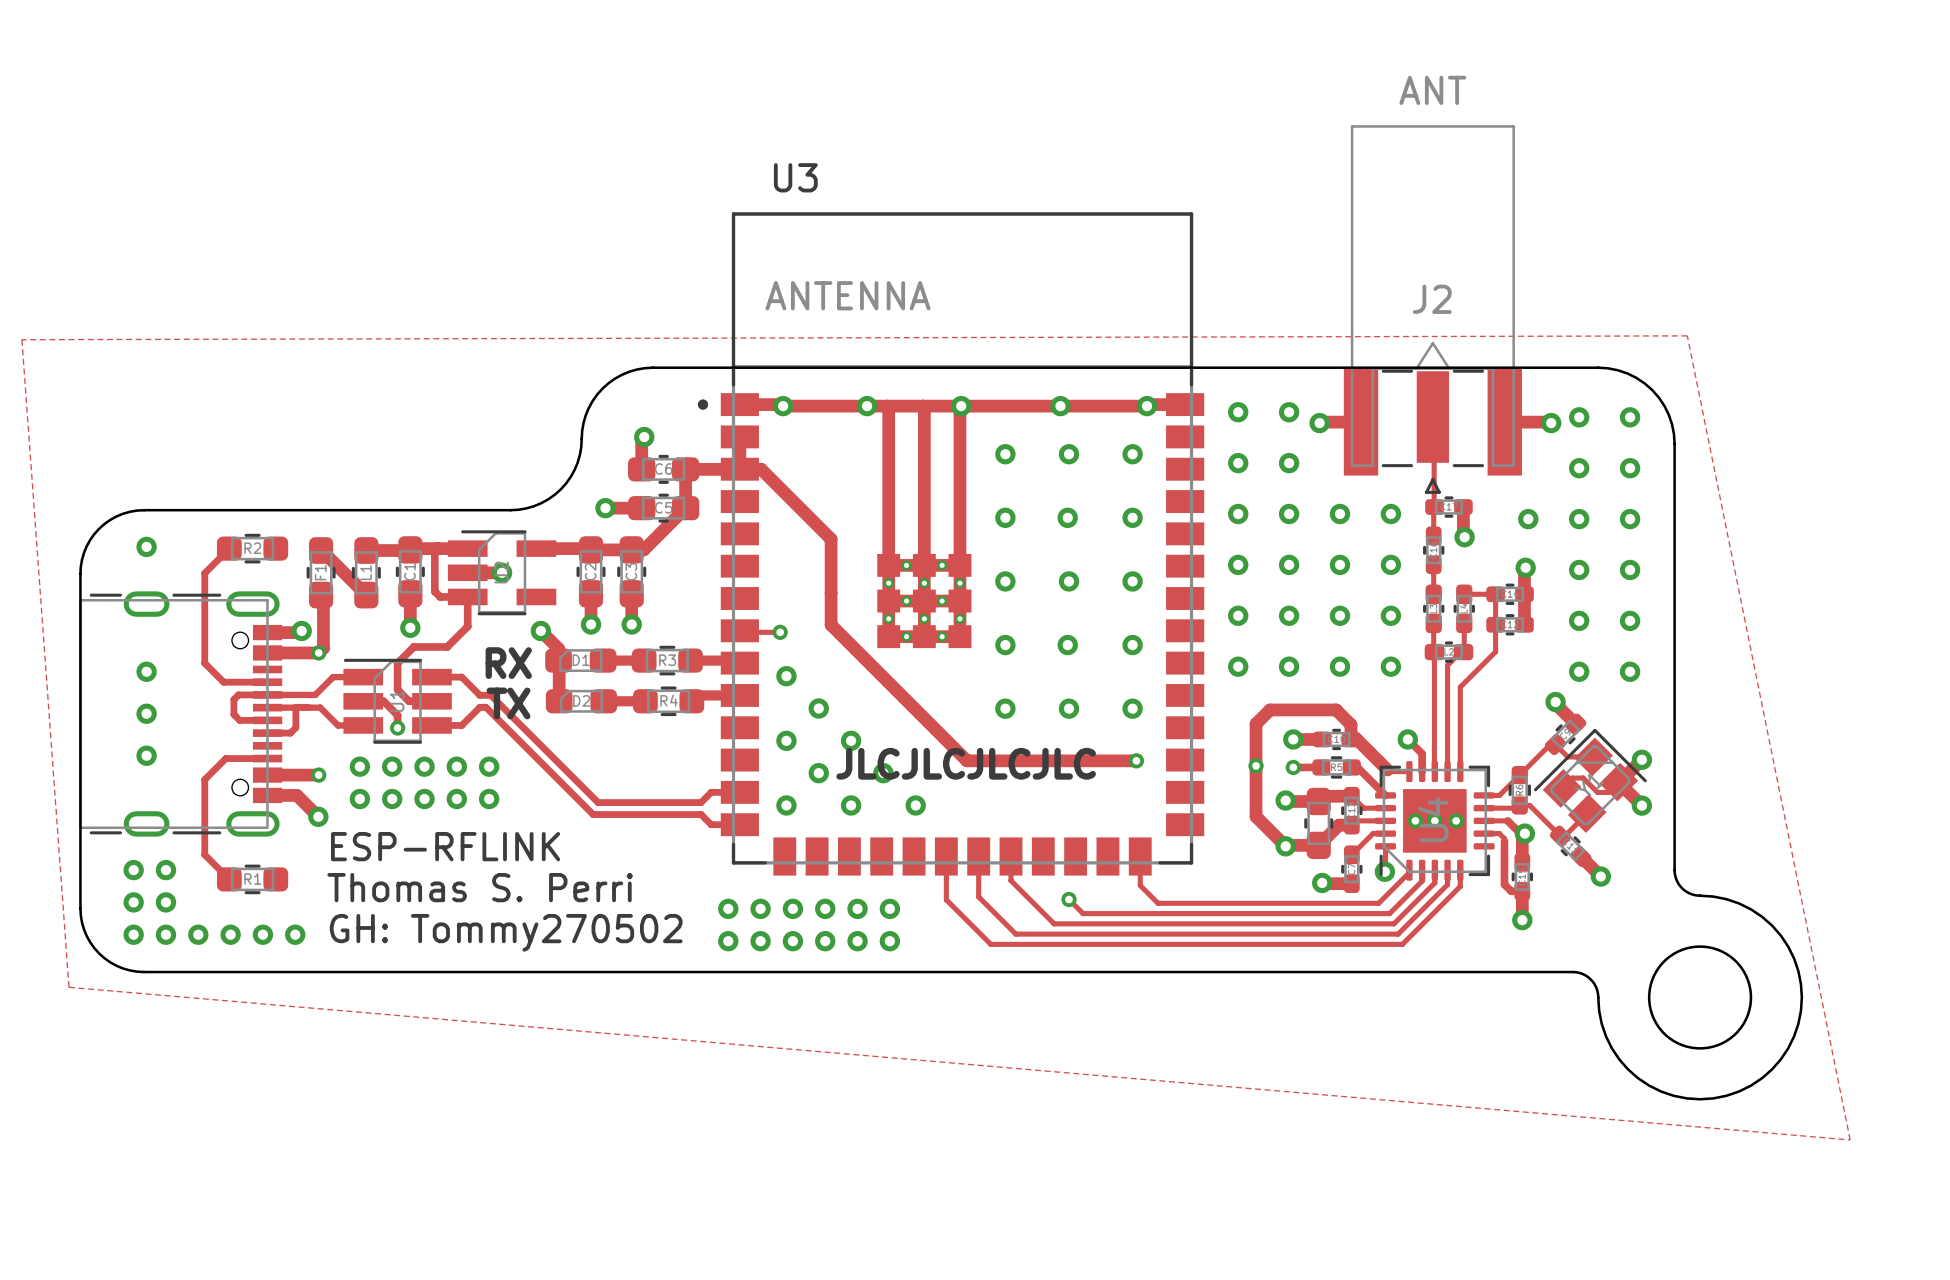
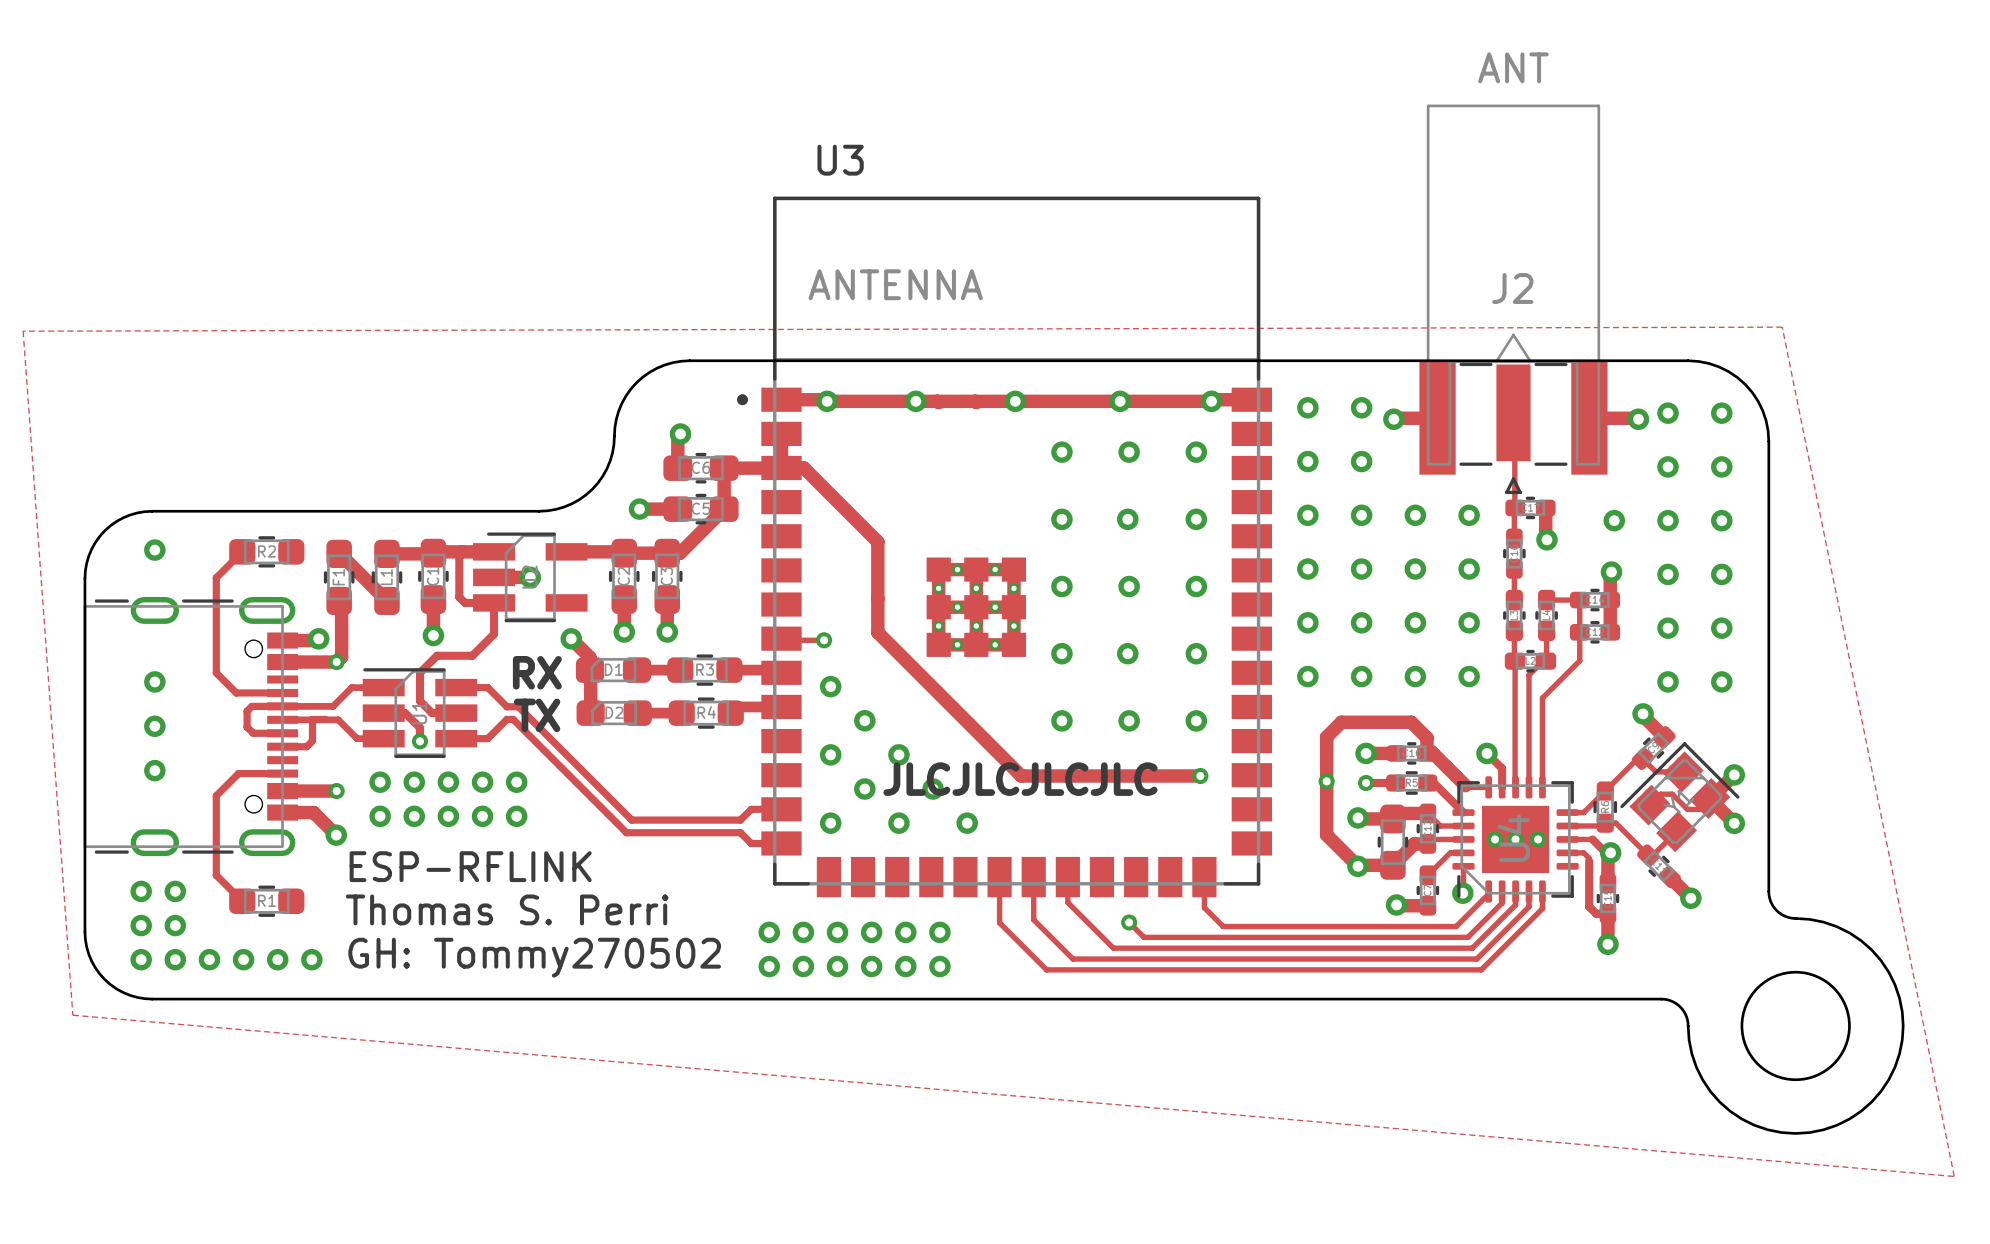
track: (888, 407) (888, 565) -> none
track: (924, 407) (924, 565) -> none
track: (959, 407) (959, 565) -> none

